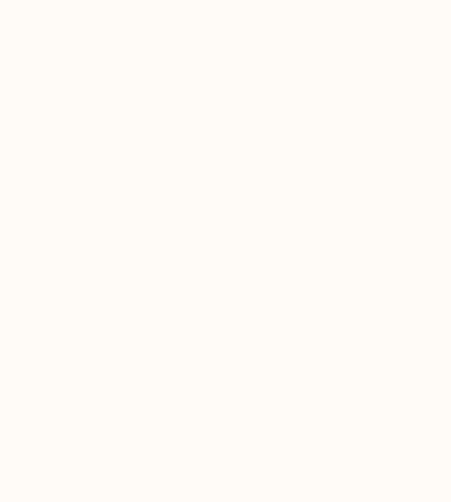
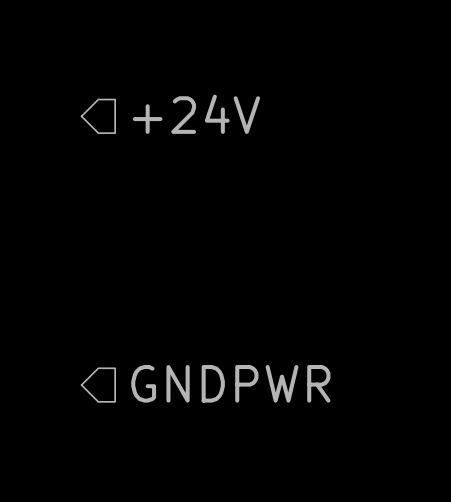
hierarchical label: none -> +24V (196, 114)
hierarchical label: none -> GNDPWR (230, 383)

